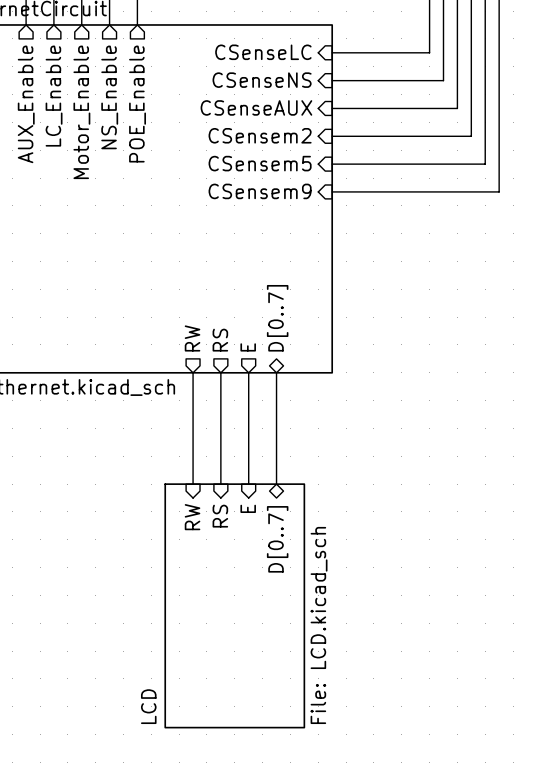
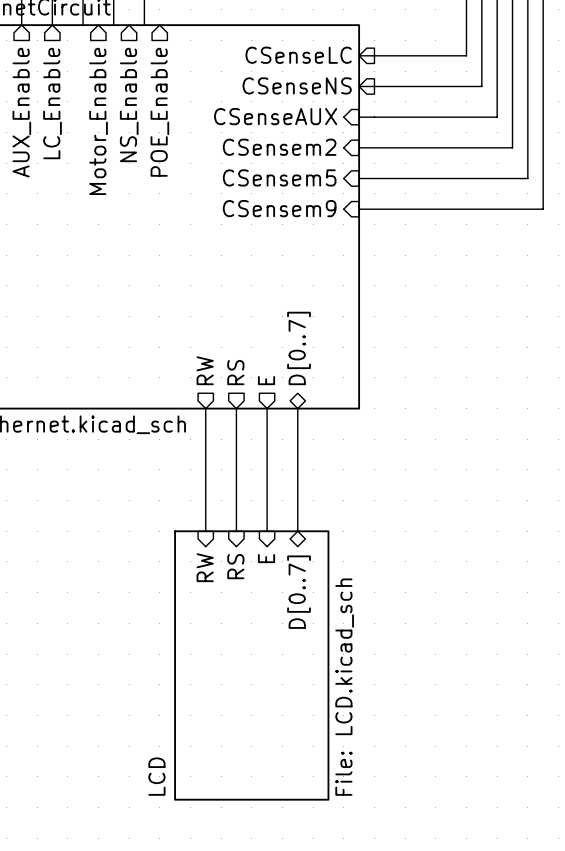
sheet pin position: CSenseLC (263, 52) -> CSenseLC (298, 55)
sheet pin position: CSenseNS (262, 80) -> CSenseNS (297, 85)
sheet pin position: NS_Enable (109, 97) -> NS_Enable (129, 104)
sheet pin position: POE_Enable (137, 104) -> POE_Enable (159, 112)
sheet pin position: Motor_Enable (81, 112) -> Motor_Enable (98, 121)

